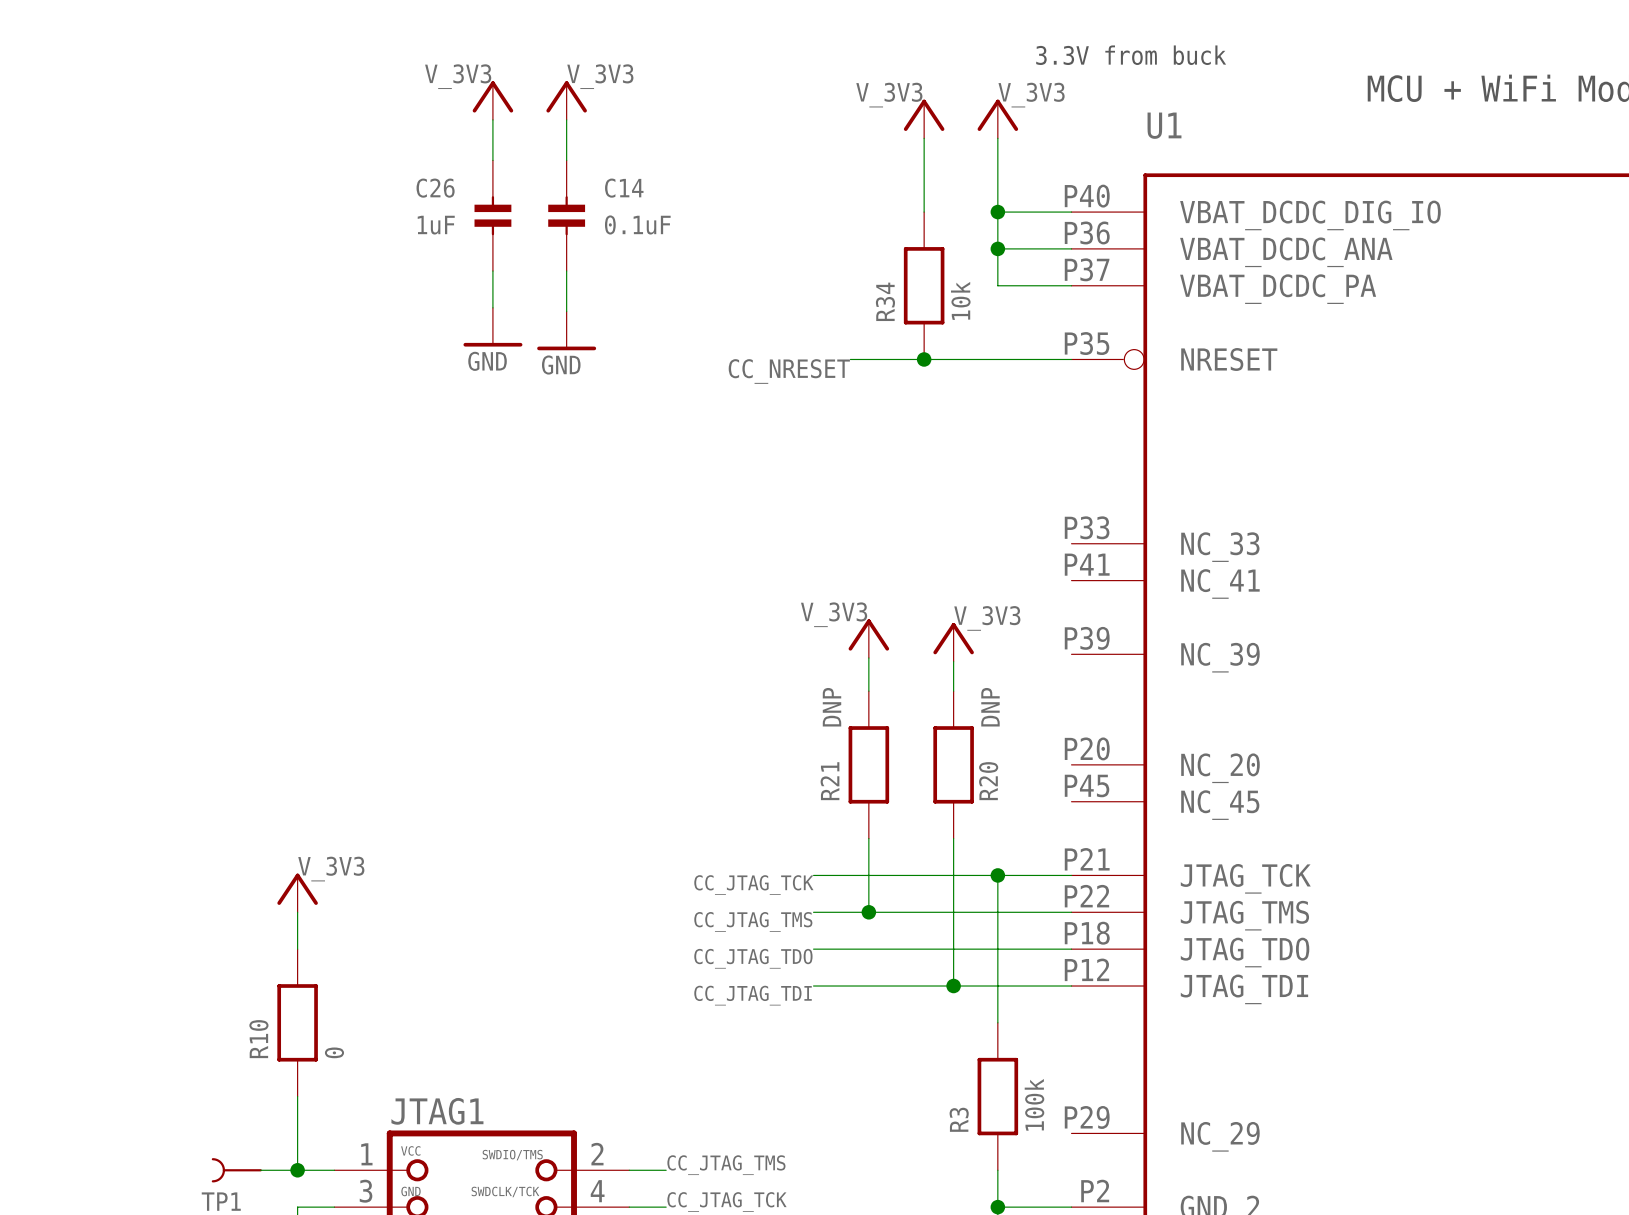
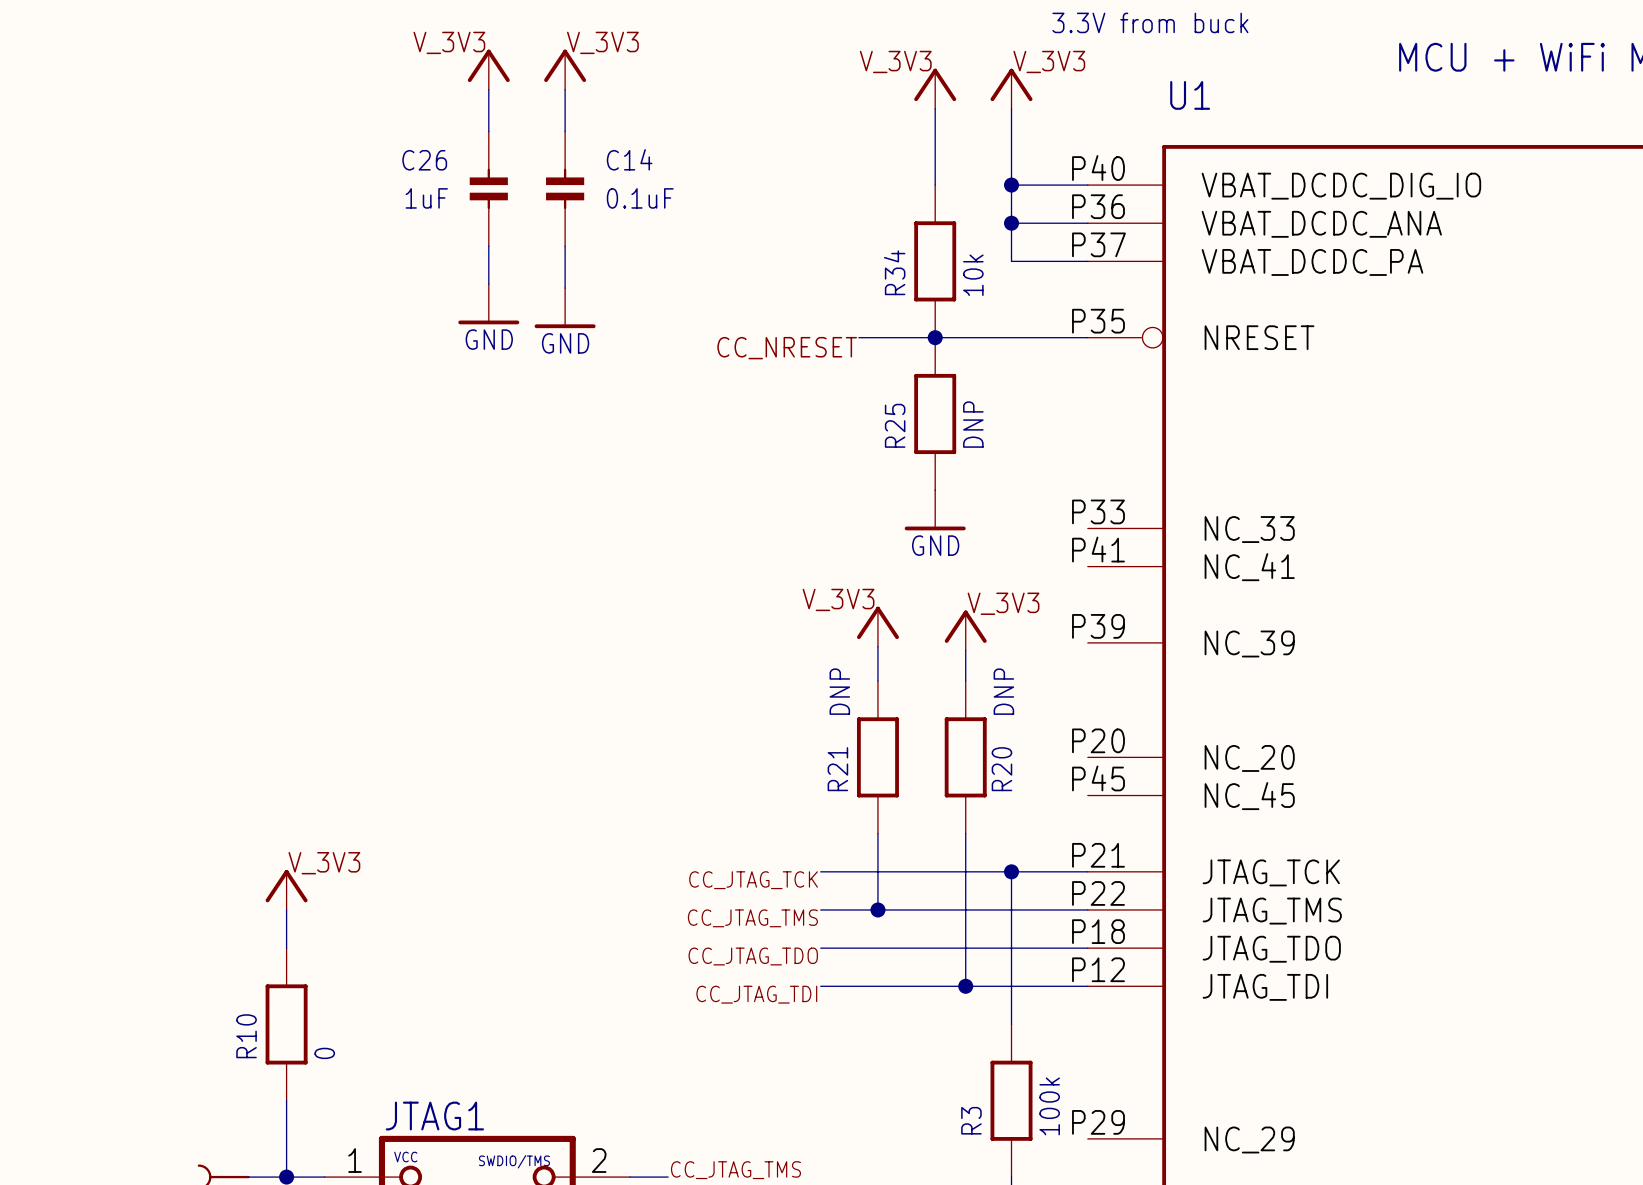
R25: none -> DNP (935, 413)
power symbol: none -> GND (935, 510)

